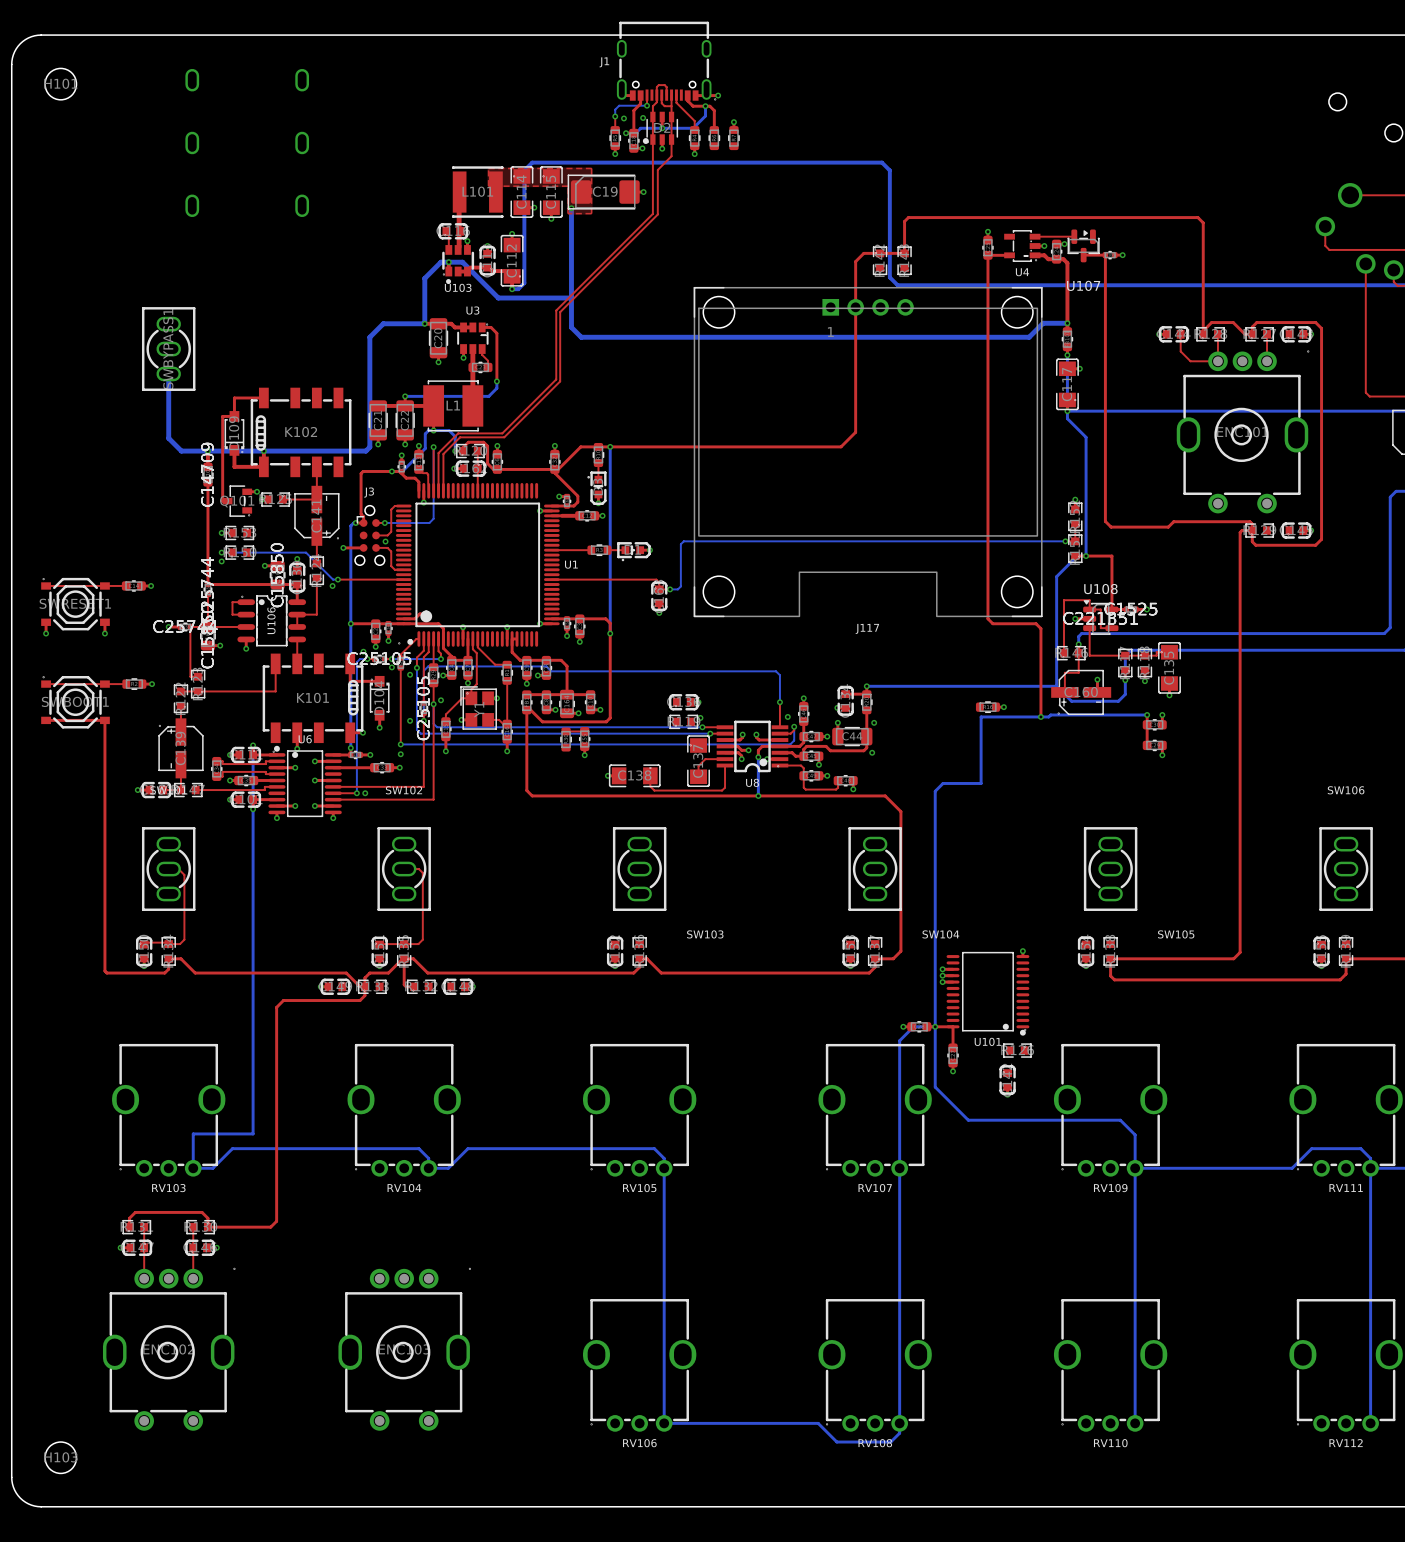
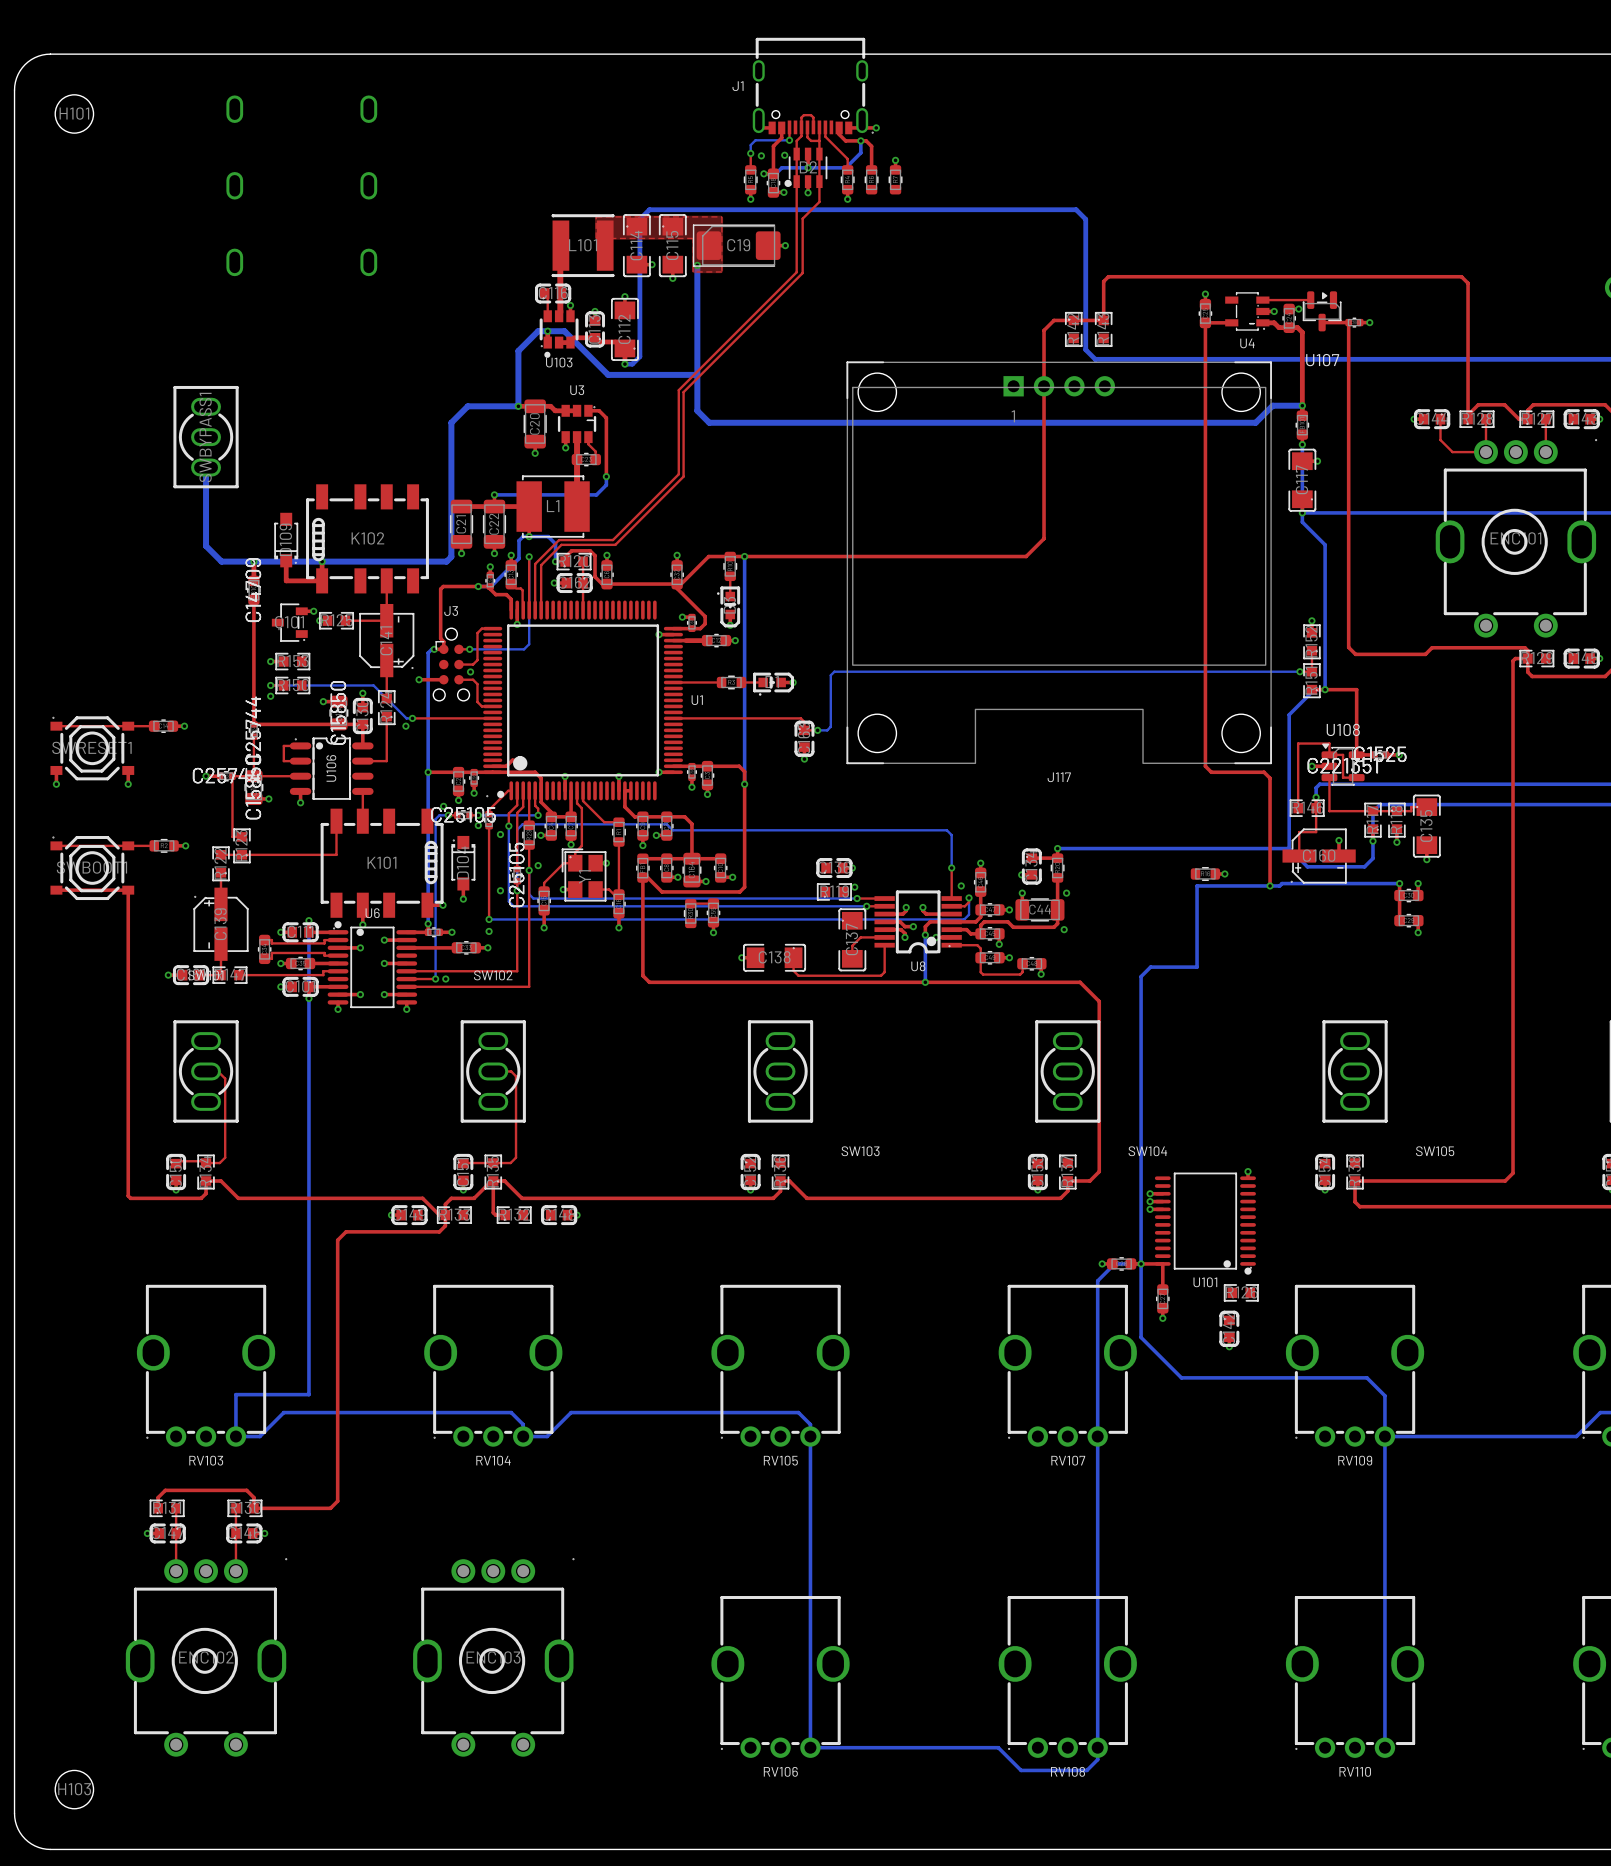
top track: (263, 397) (234, 397) (234, 416) (222, 416) (222, 501) (227, 501) -> none
top track: (297, 614) (297, 626) -> none
top track: (350, 663) (350, 681) (379, 681) -> none

